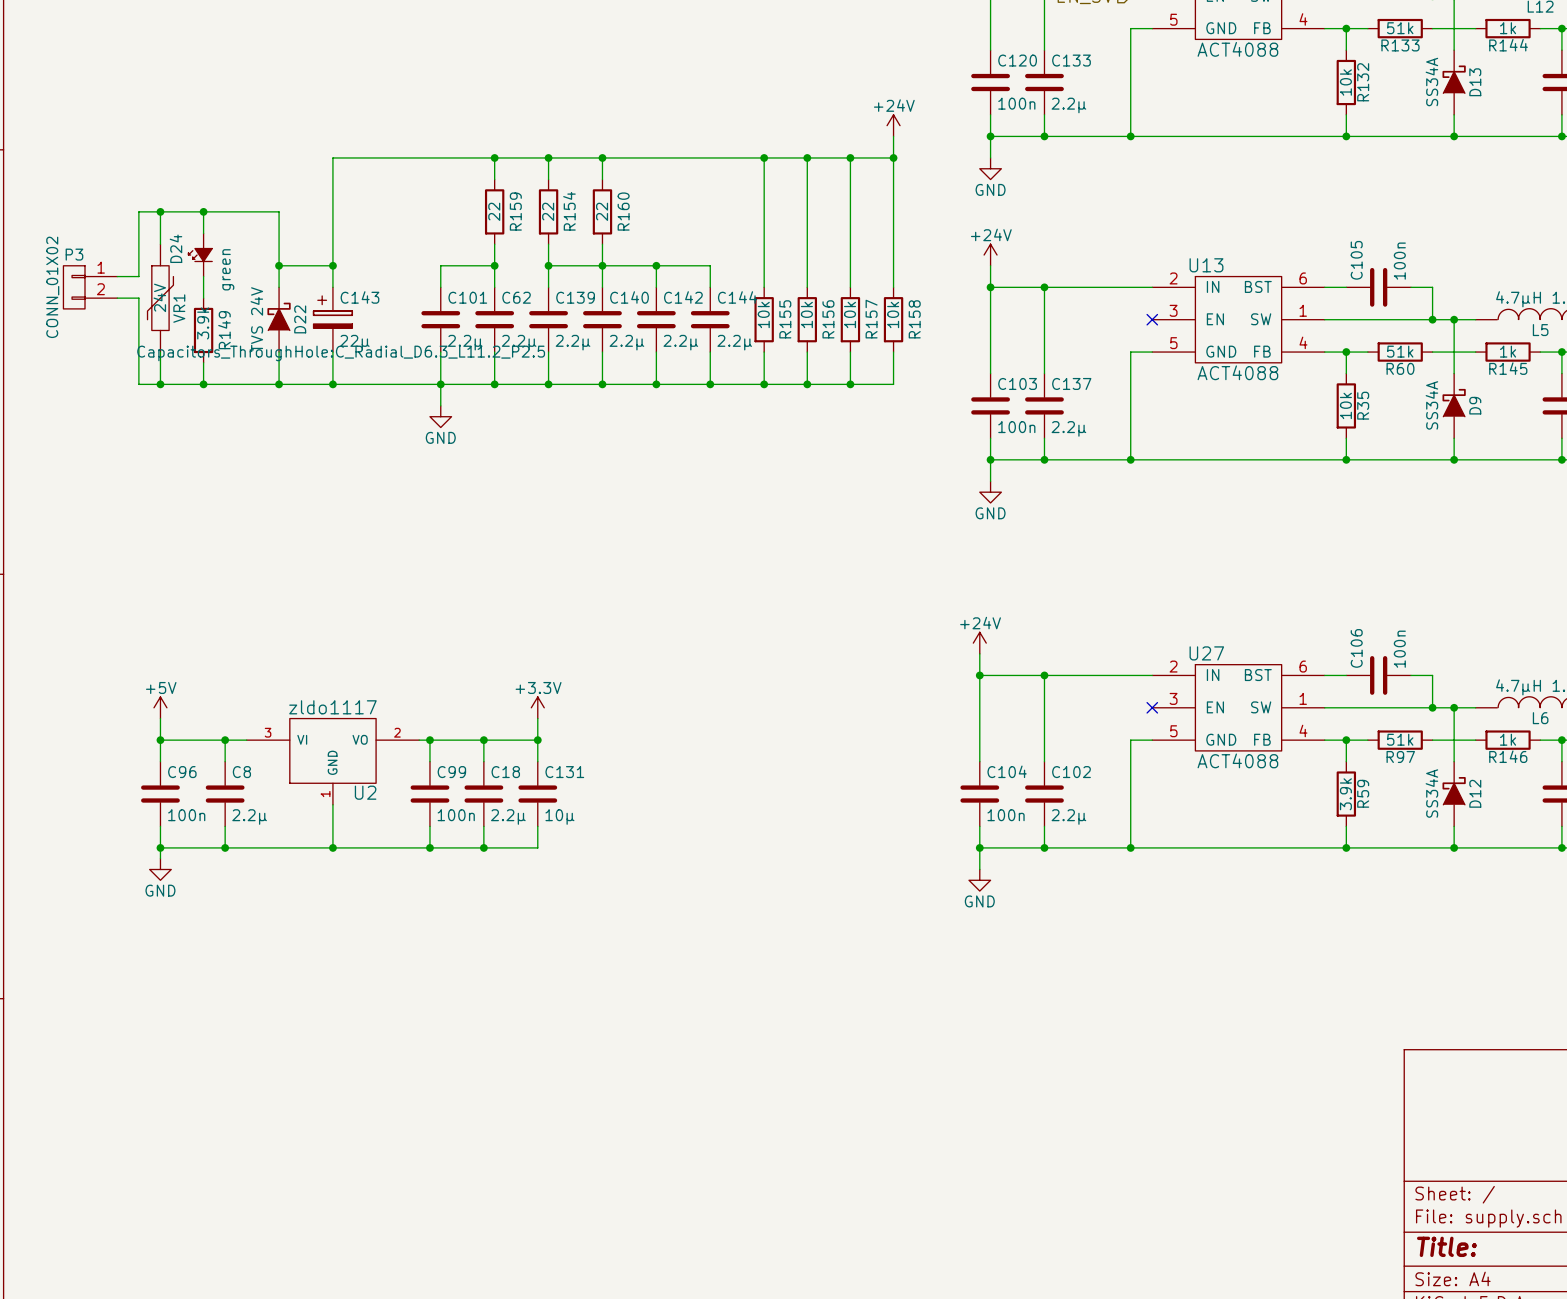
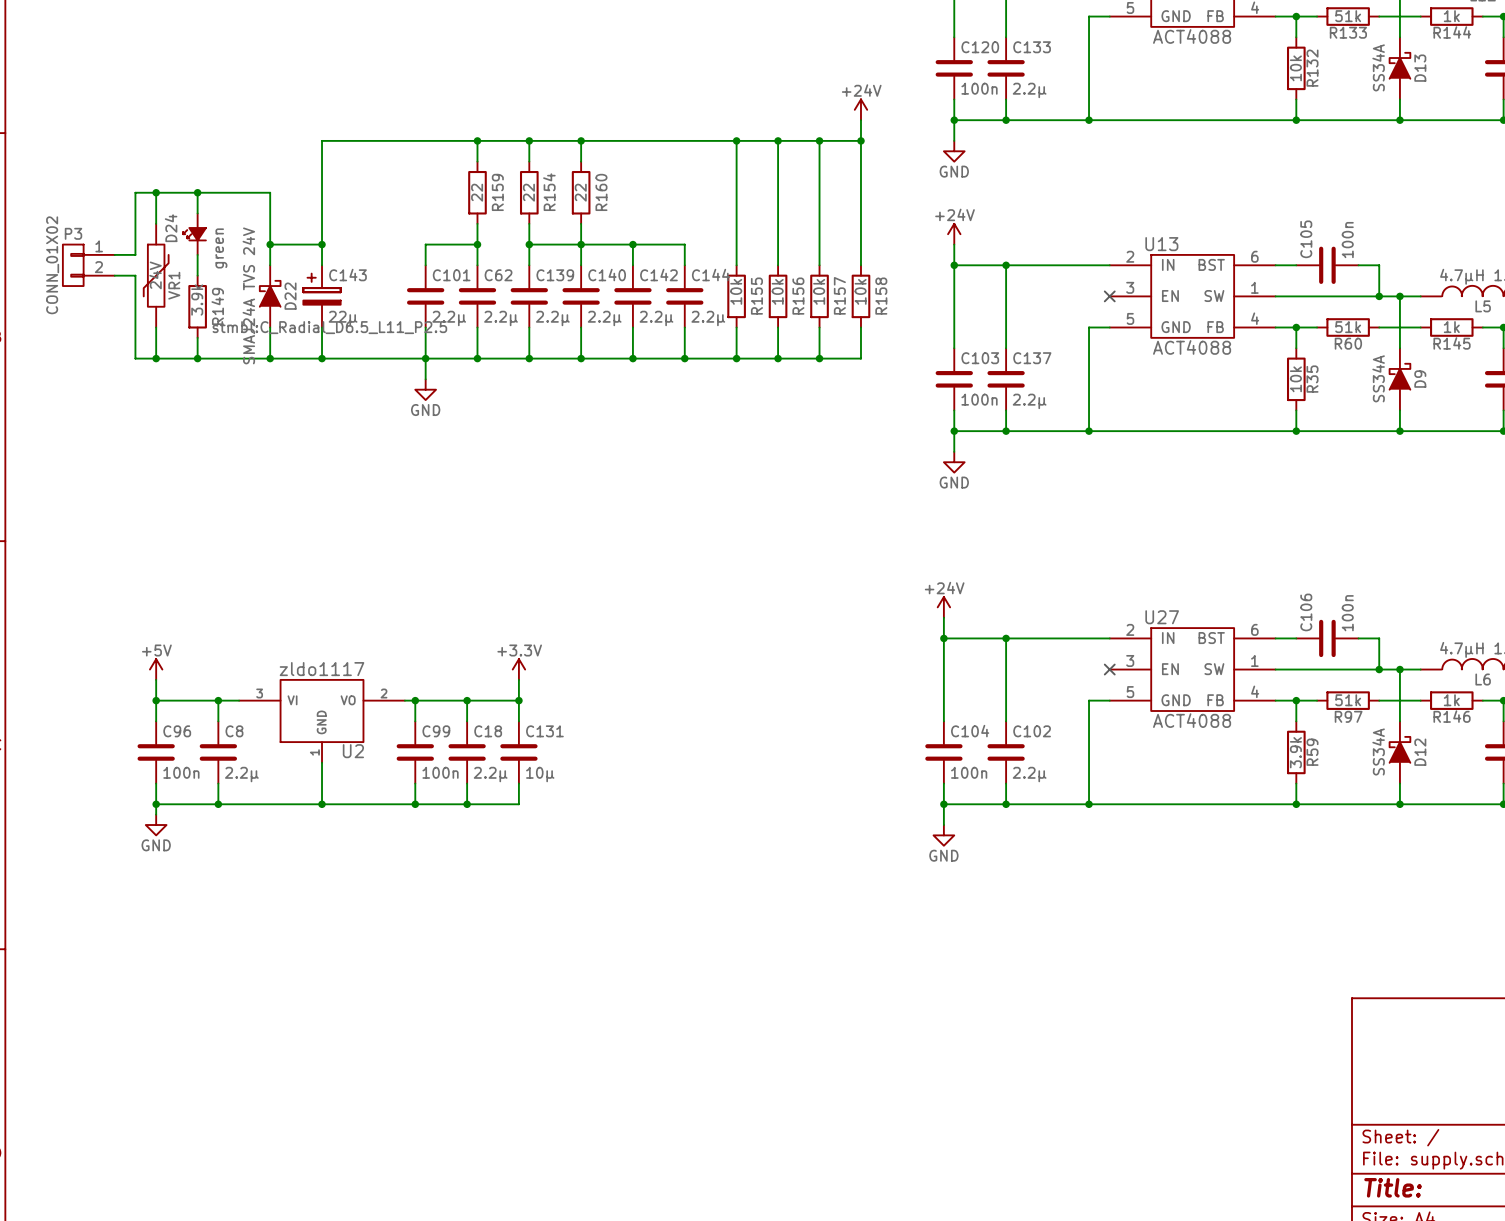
D22 value: TVS 24V (256, 319) -> SMAJ24A TVS 24V (248, 295)
C143 text: Capacitors_ThroughHole:C_Radial_D6.3_L11.2_P2.5 (341, 353) -> stmbl:C_Radial_D6.5_L11_P2.5 (329, 327)

